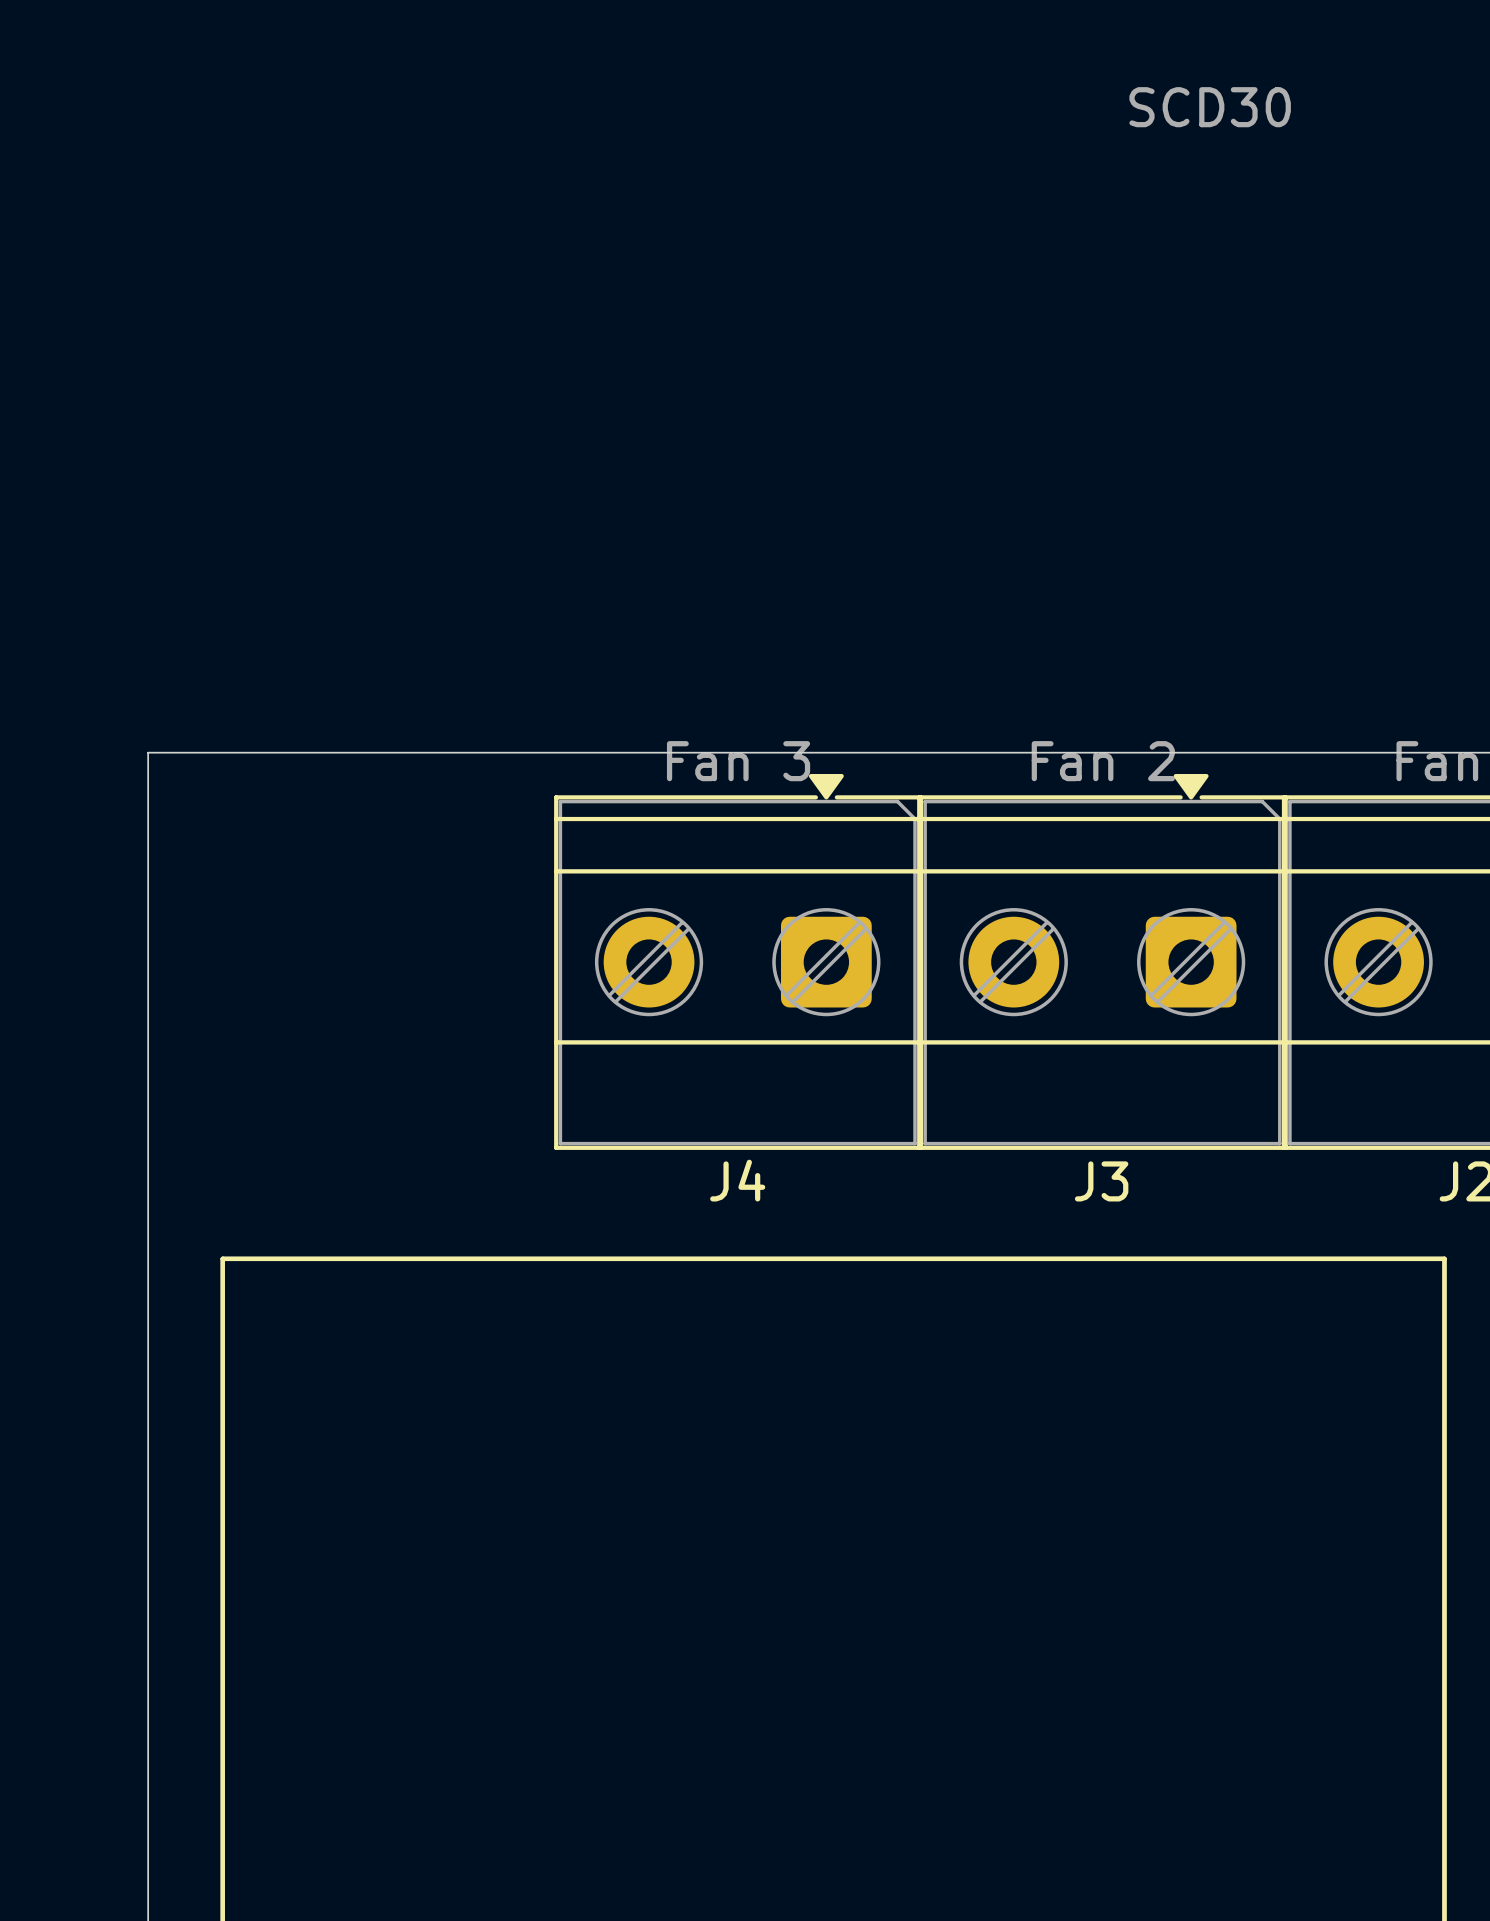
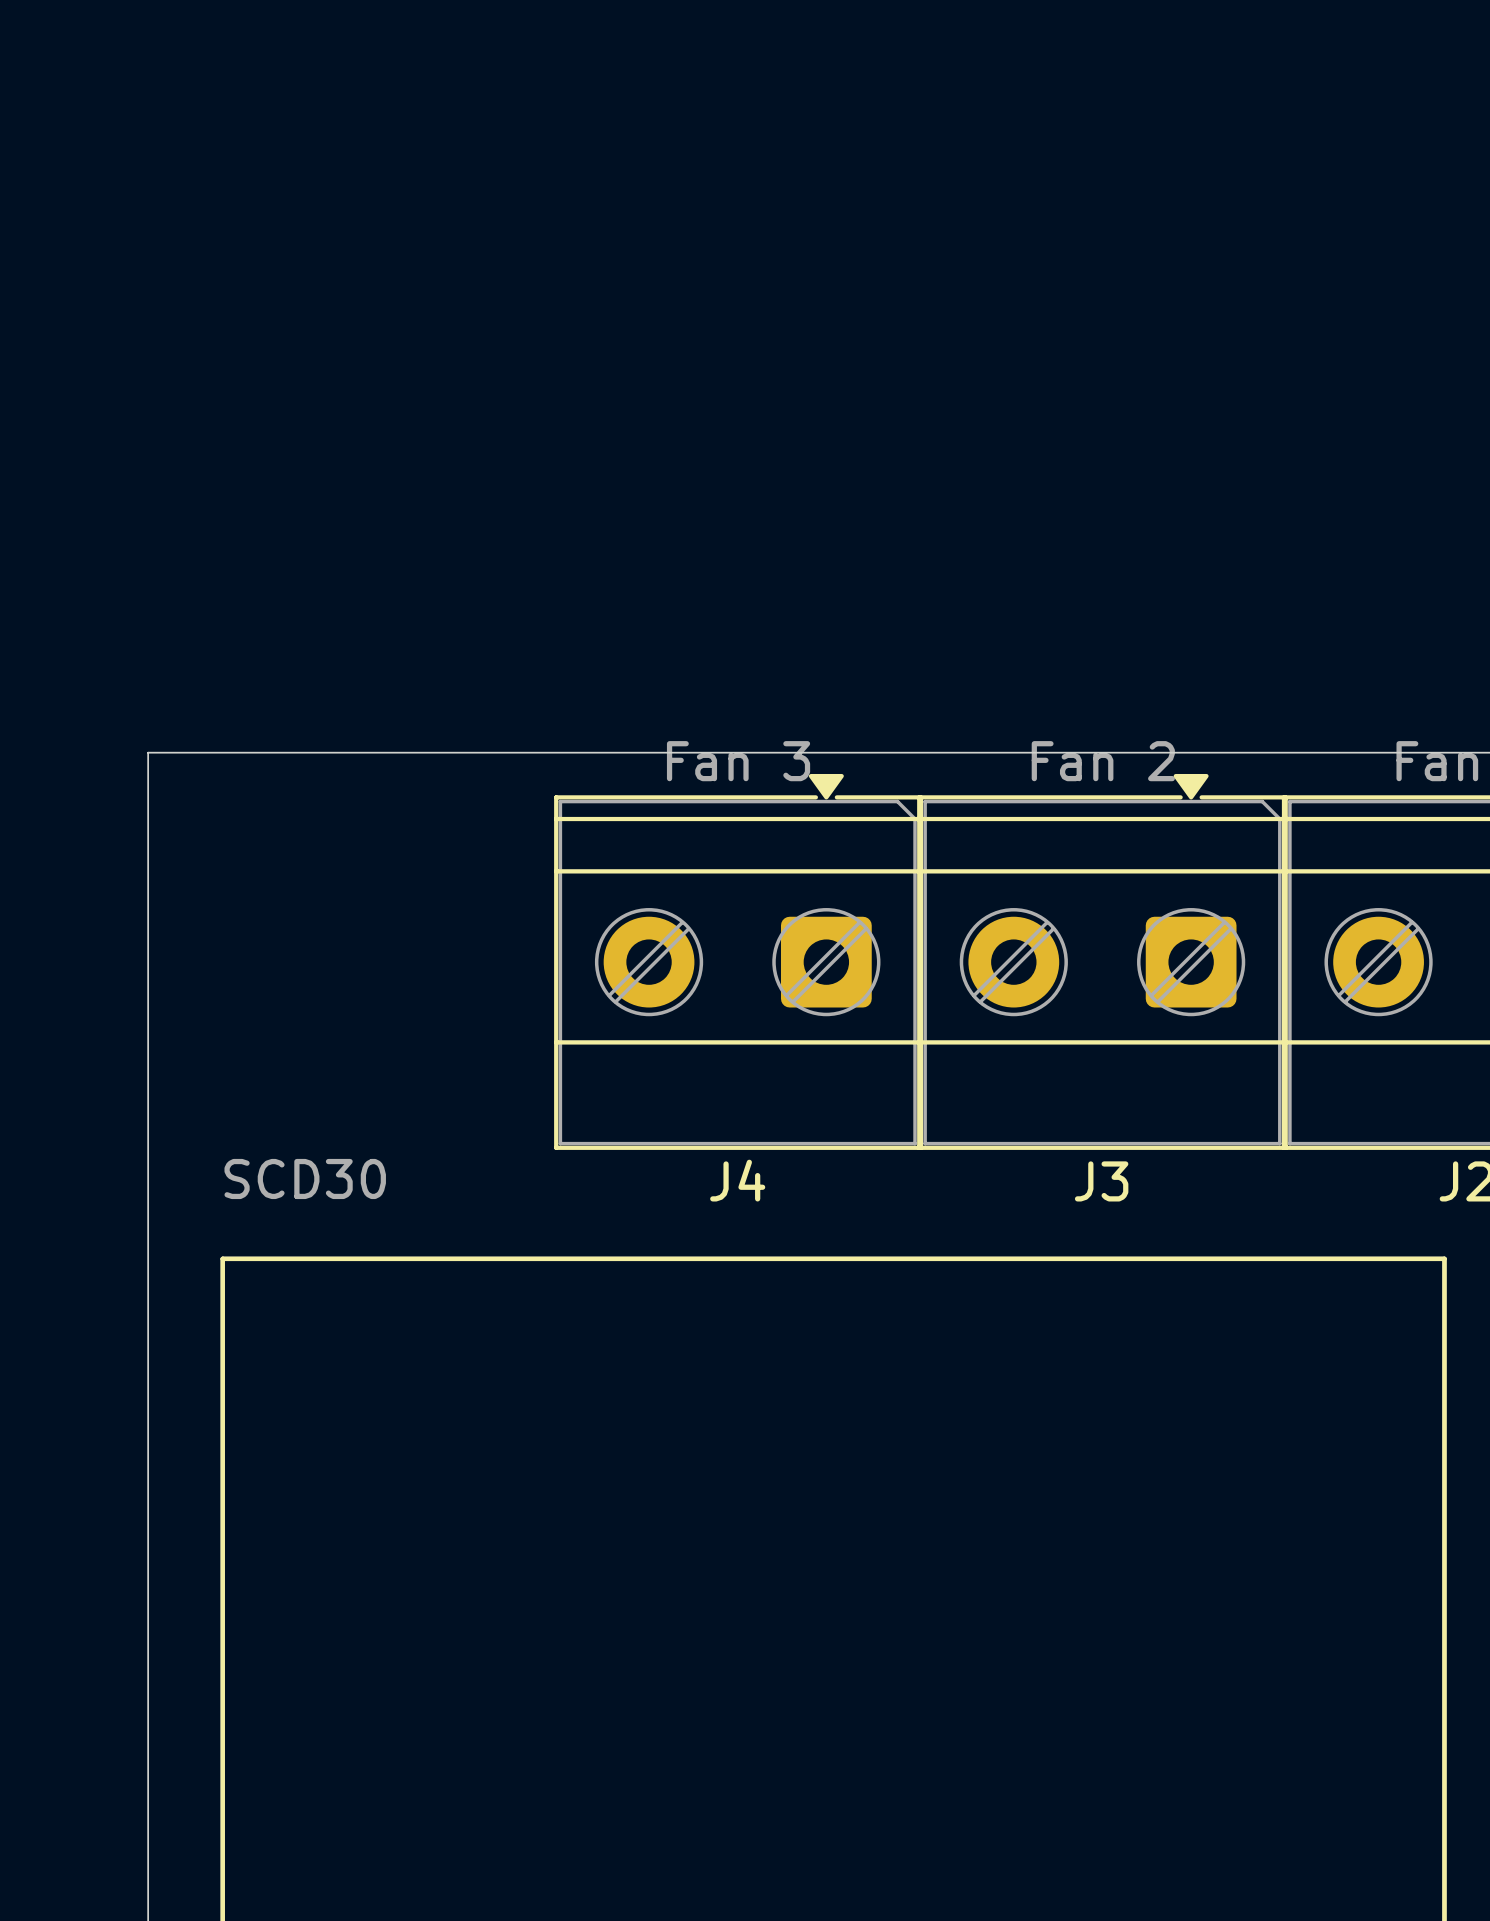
part value position: SCD30 (1210, 107) -> SCD30 (305, 1178)

